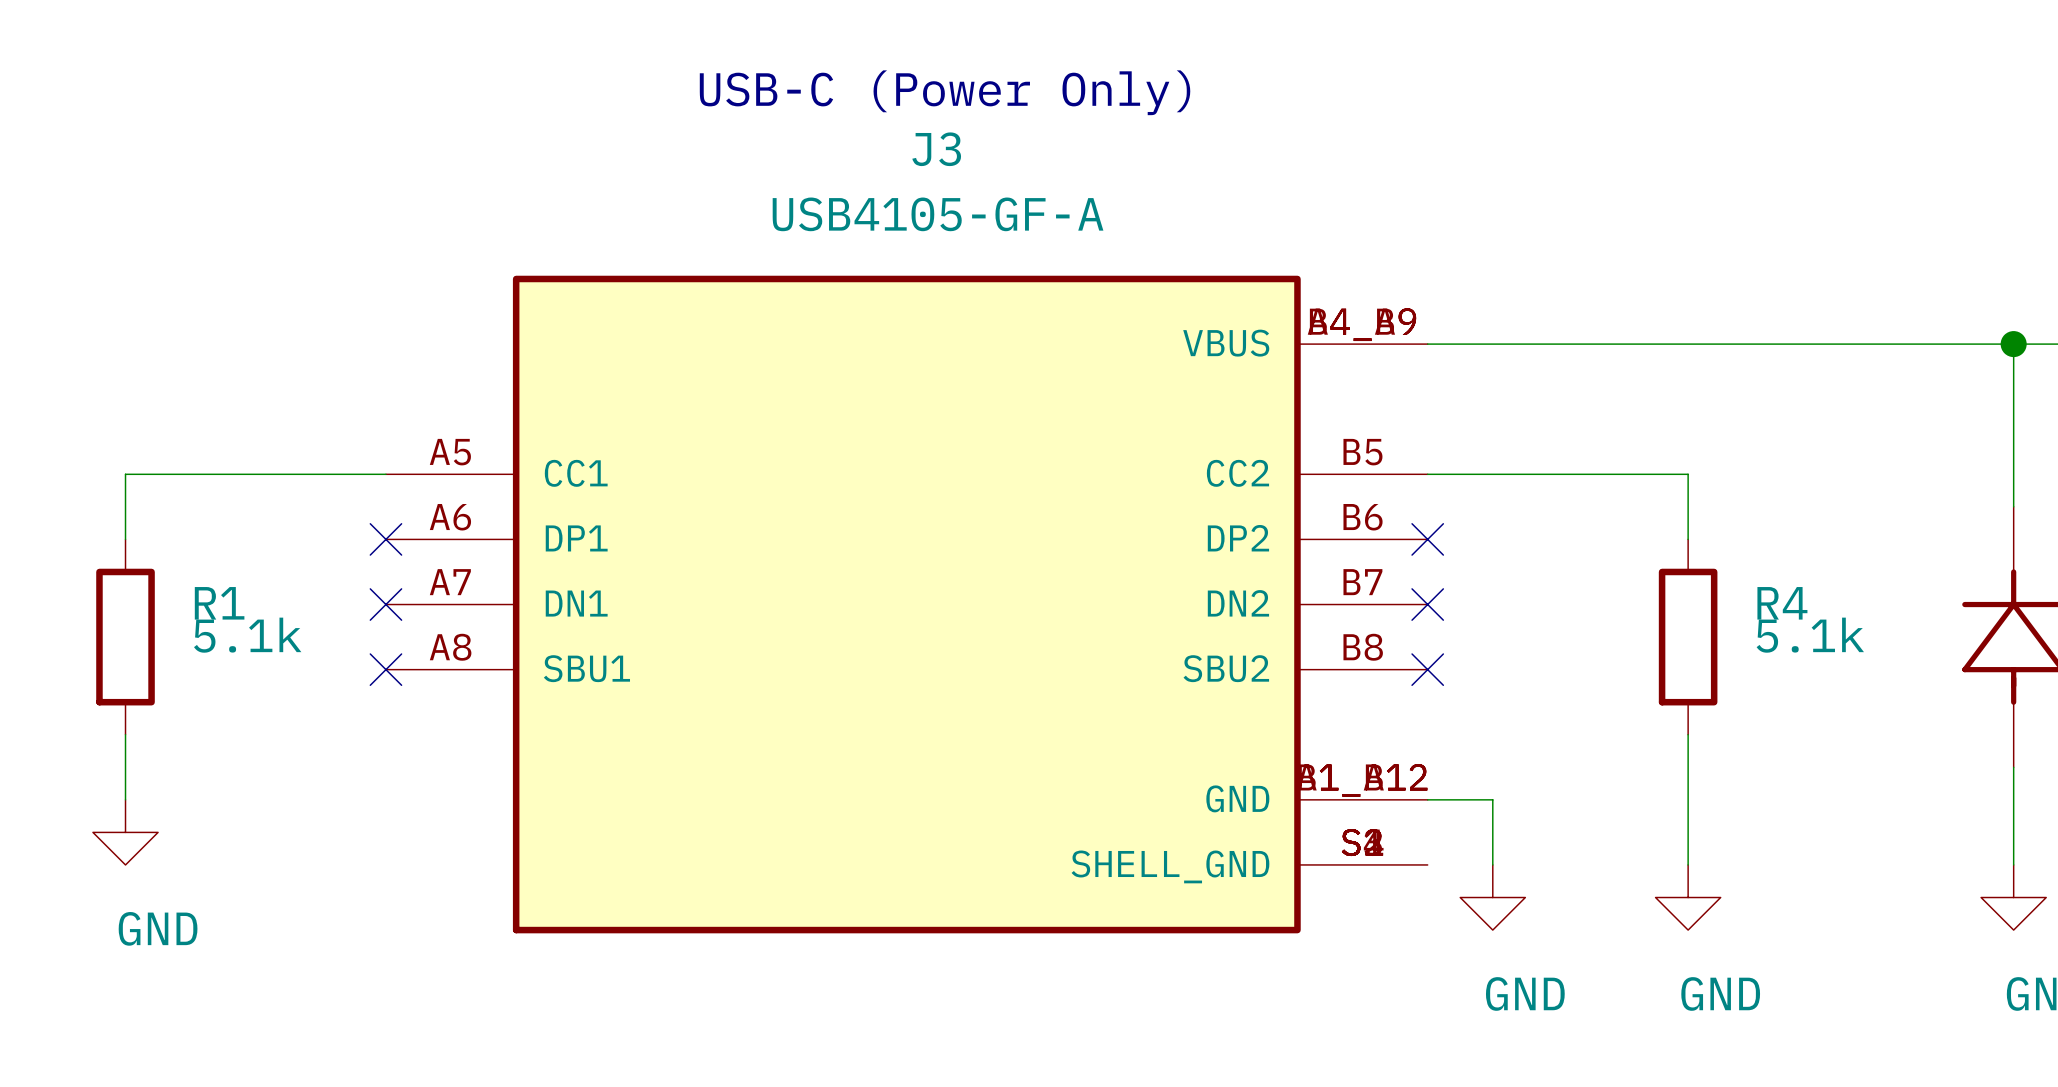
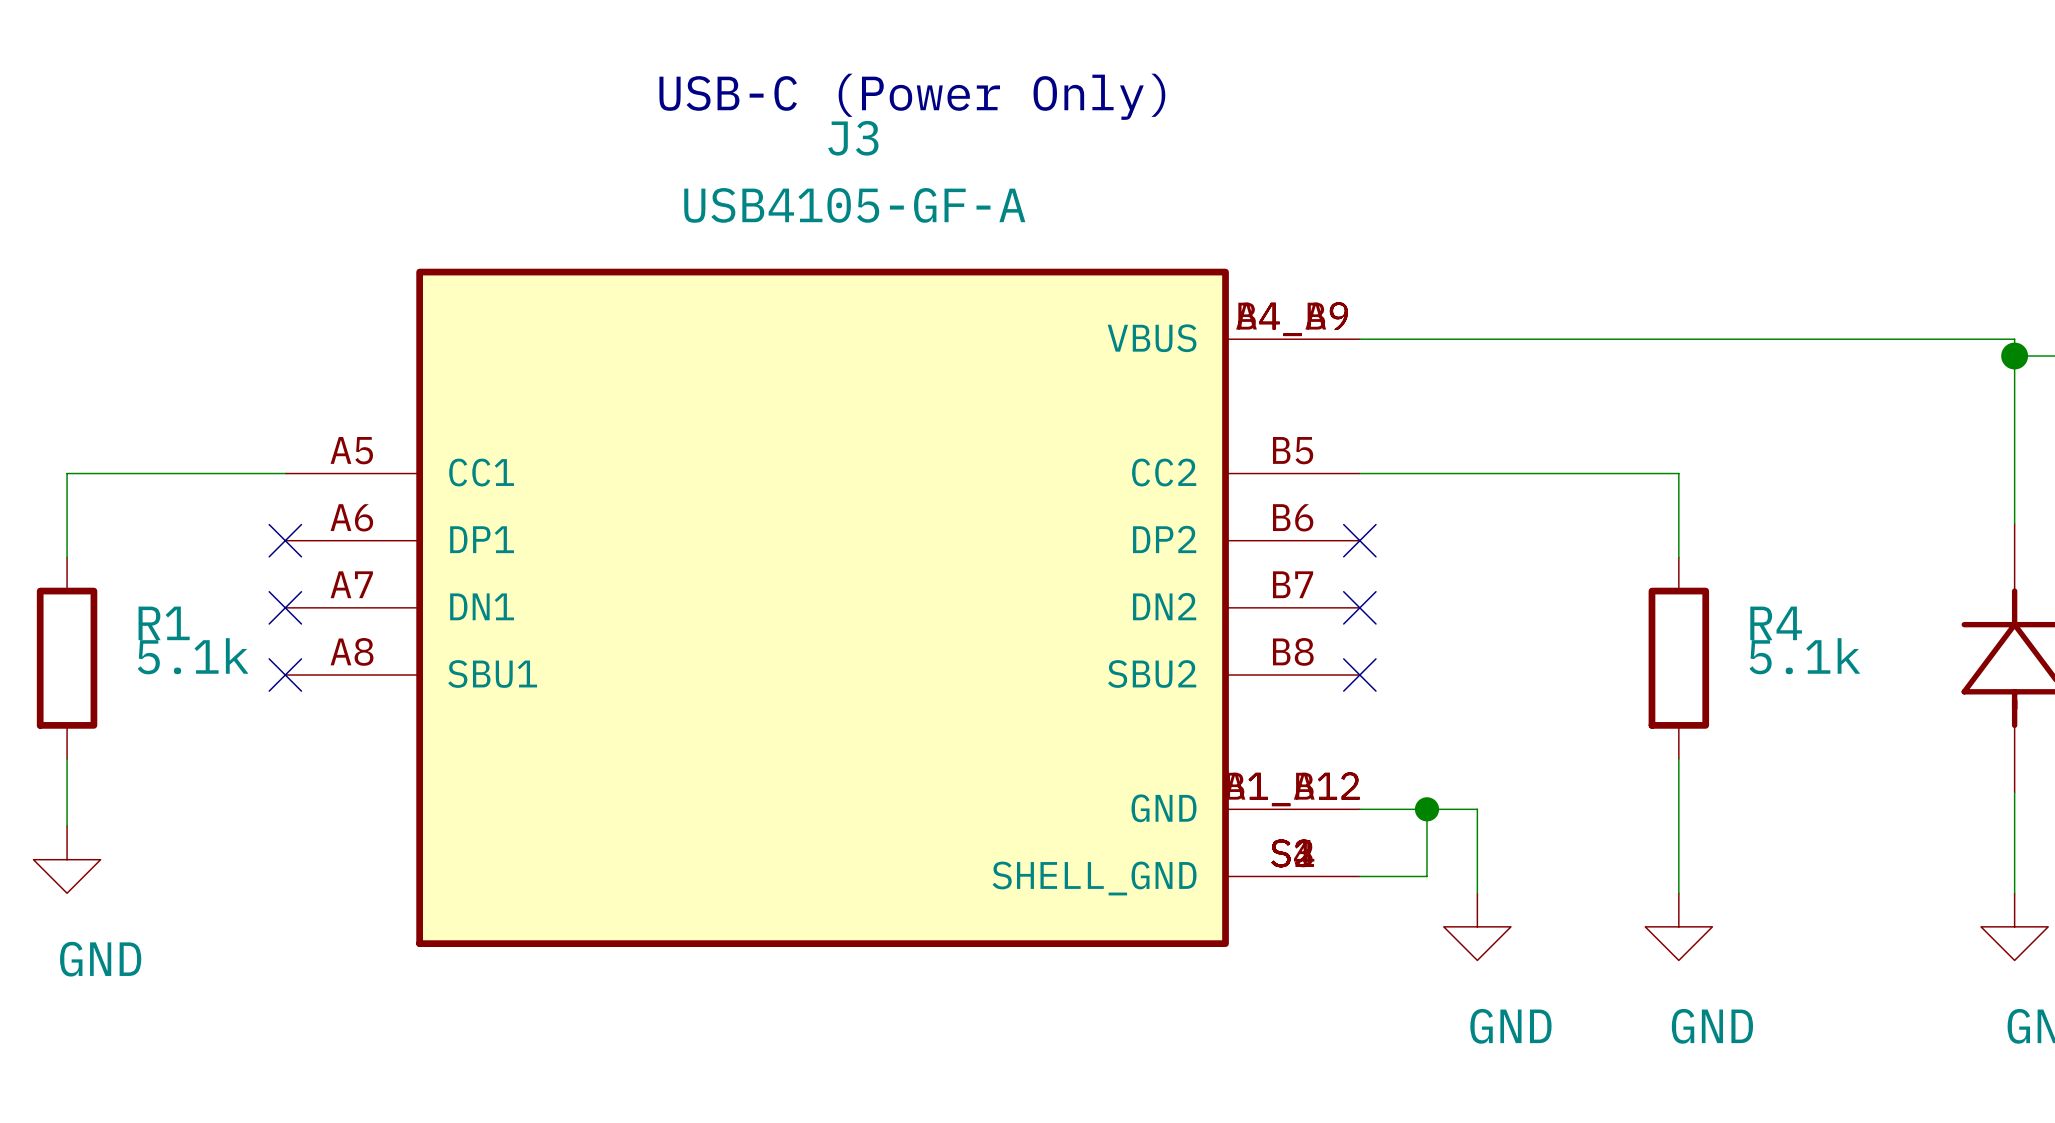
wire: (1427, 344) (2013, 344) -> (1359, 339) (2014, 339) (2014, 356)
wire: (125, 474) (385, 474) -> (67, 490) (67, 473) (285, 473)
wire: (1427, 474) (1688, 474) -> (1359, 473) (1678, 473) (1678, 490)
no-connect mark: none -> (285, 540)
no-connect mark: none -> (1359, 540)
no-connect mark: (385, 539) -> none
no-connect mark: (1427, 539) -> none
no-connect mark: none -> (285, 607)
no-connect mark: none -> (1359, 607)
no-connect mark: (385, 604) -> none
J3 position: (906, 604) -> (822, 607)
no-connect mark: (1427, 604) -> none
no-connect mark: none -> (285, 675)
no-connect mark: none -> (1359, 675)
no-connect mark: (385, 669) -> none
no-connect mark: (1427, 669) -> none
wire: none -> (1427, 809) (1427, 876) (1359, 876)
junction: none -> (1427, 809)
wire: (1427, 799) (1492, 799) -> (1359, 809) (1477, 809) (1477, 826)

